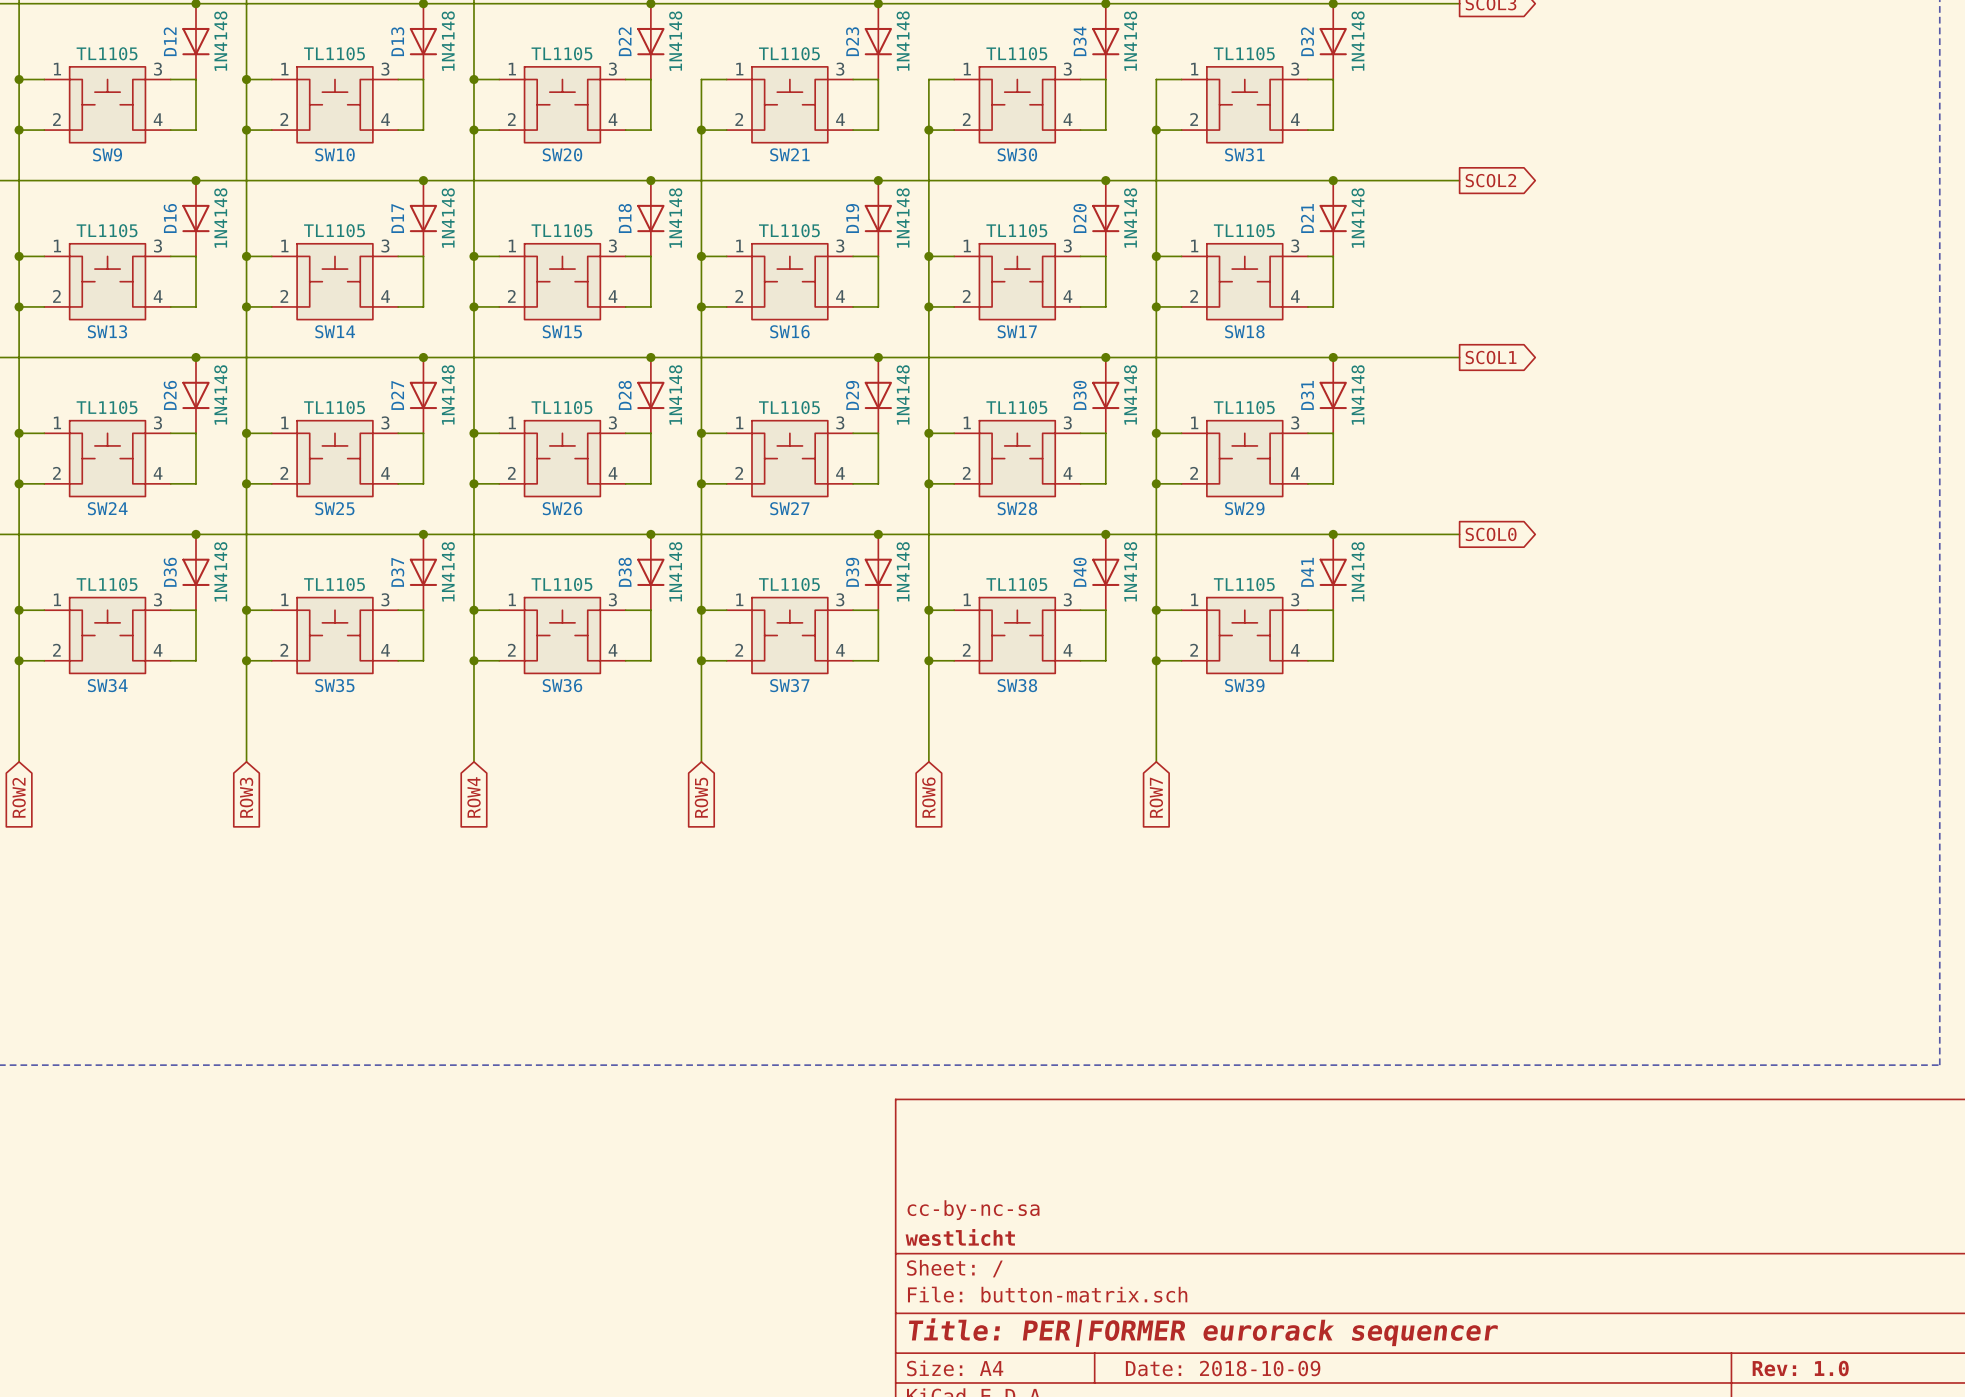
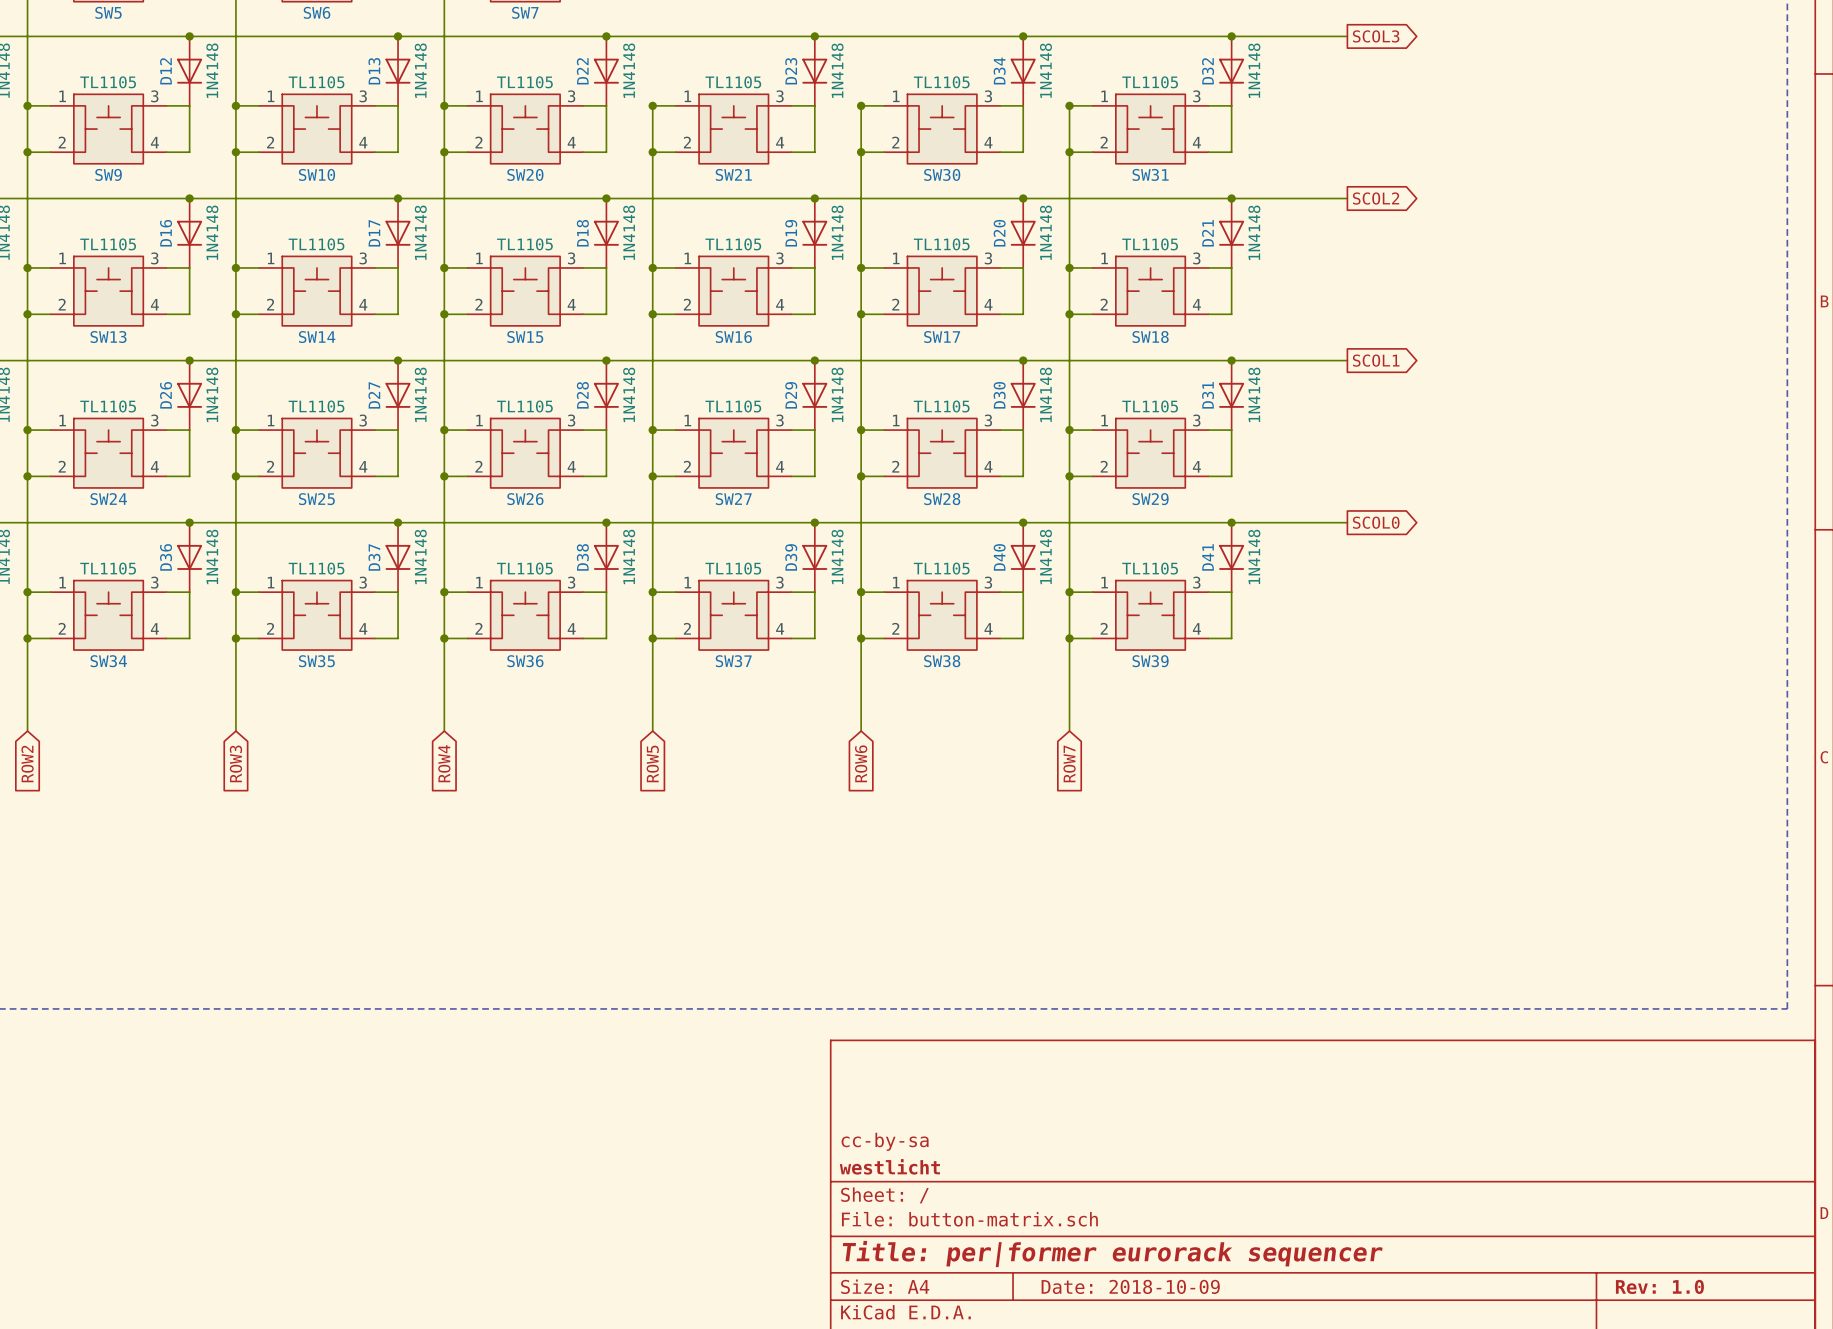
junction: none -> (652, 105)
junction: none -> (861, 105)
junction: none -> (1069, 105)
title block: cc-by-nc-sa (973, 1210) -> cc-by-sa (885, 1141)
title block: Title: PER|FORMER eurorack sequencer (1203, 1332) -> Title: per|former eurorack sequencer (1112, 1254)

